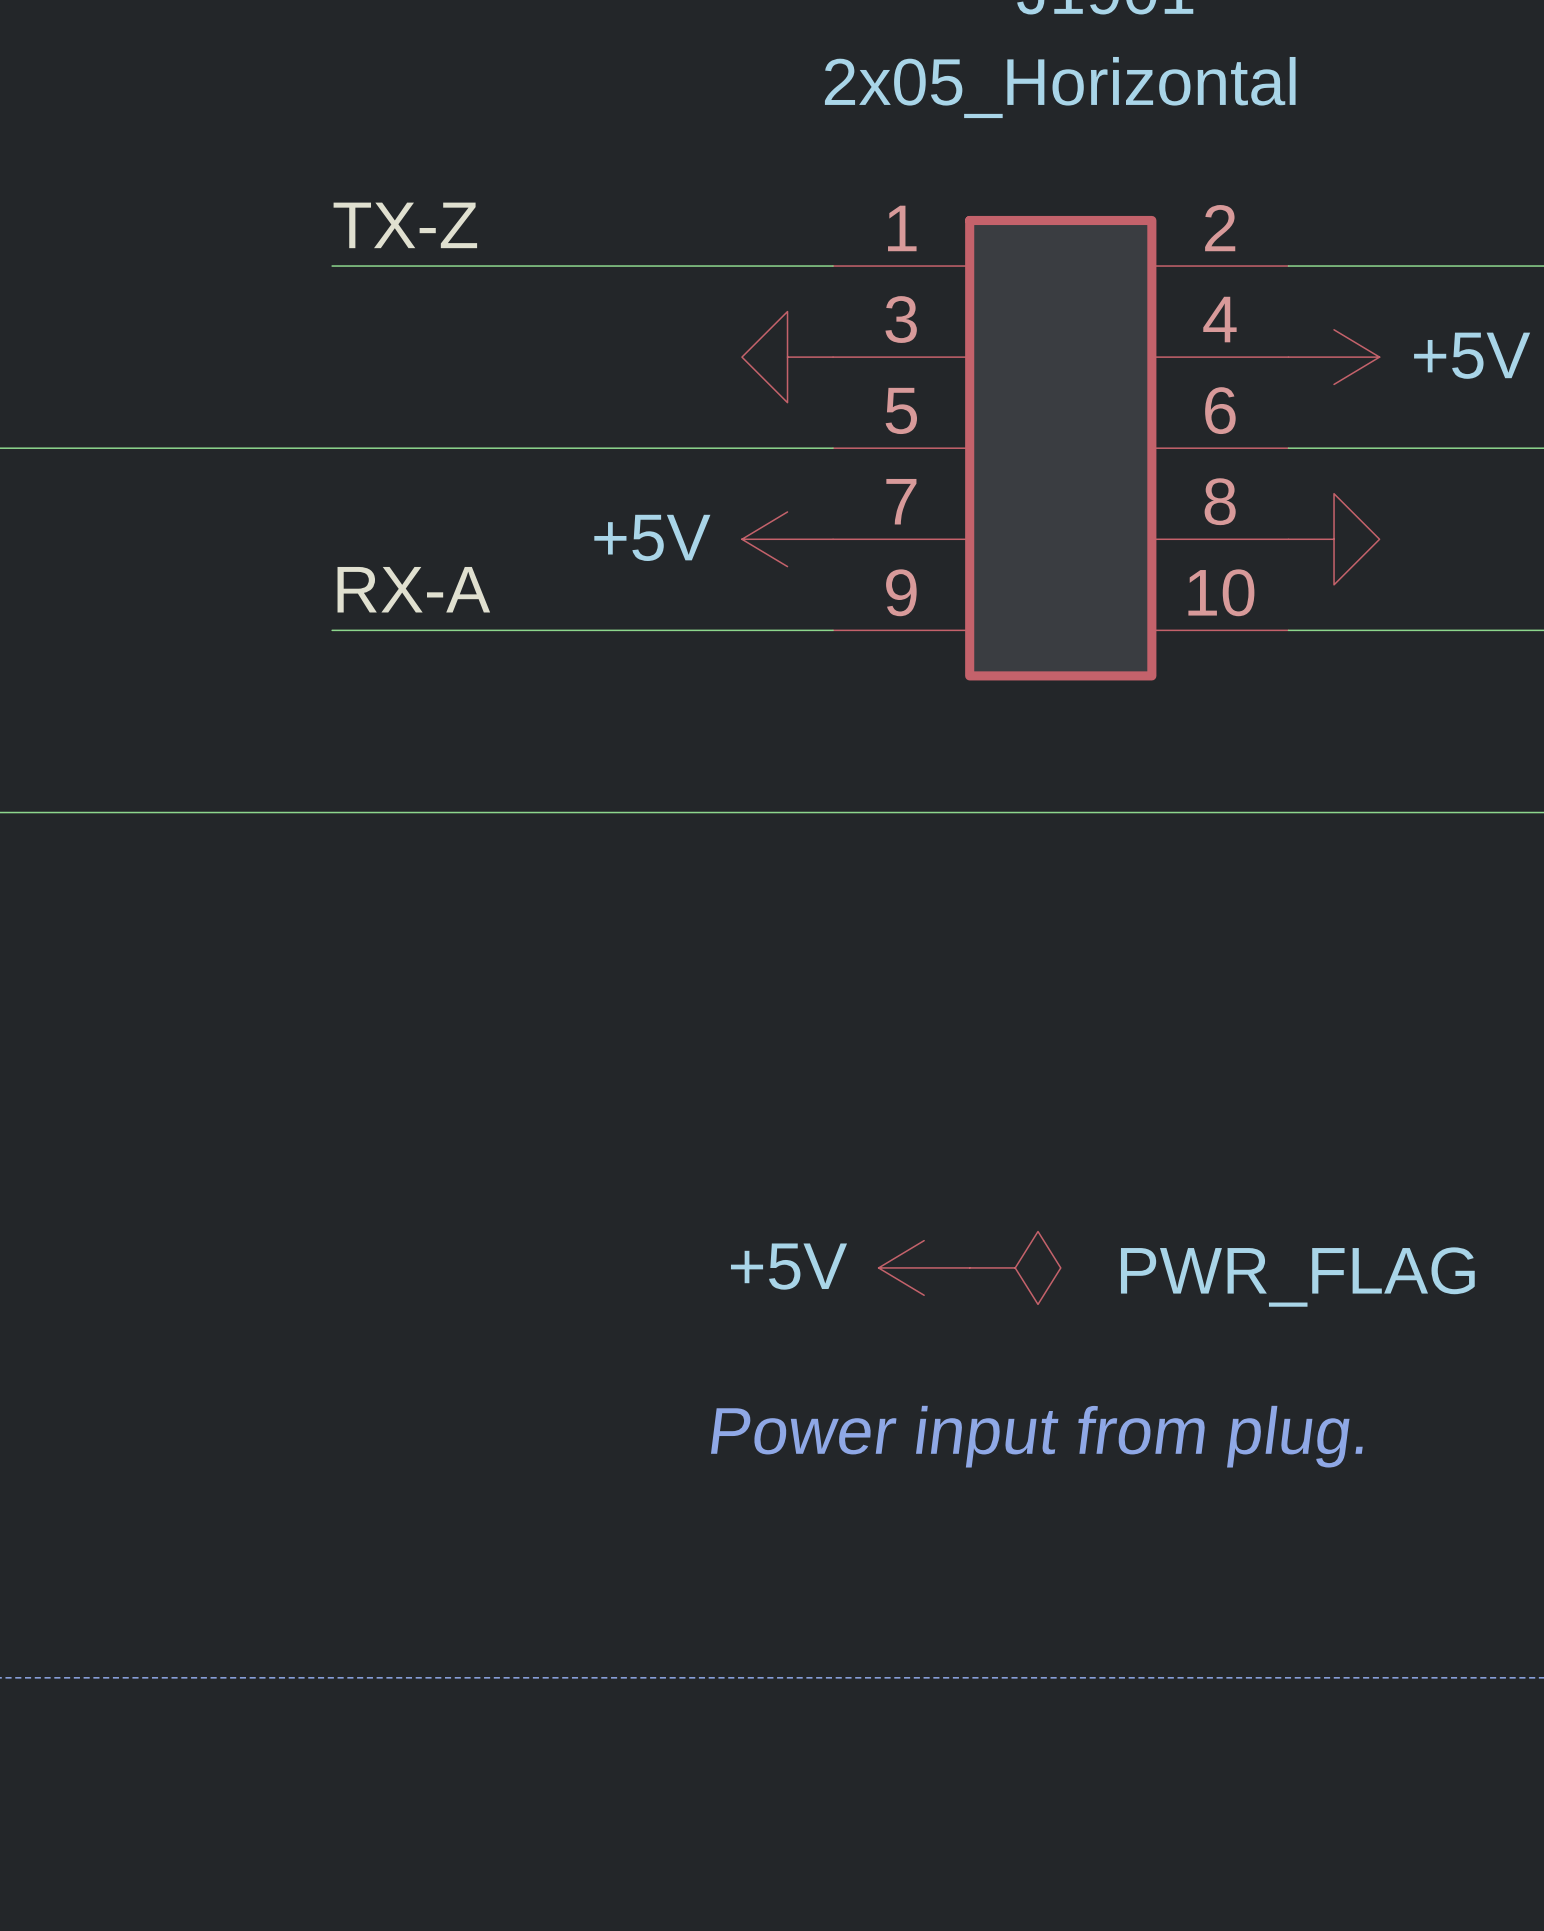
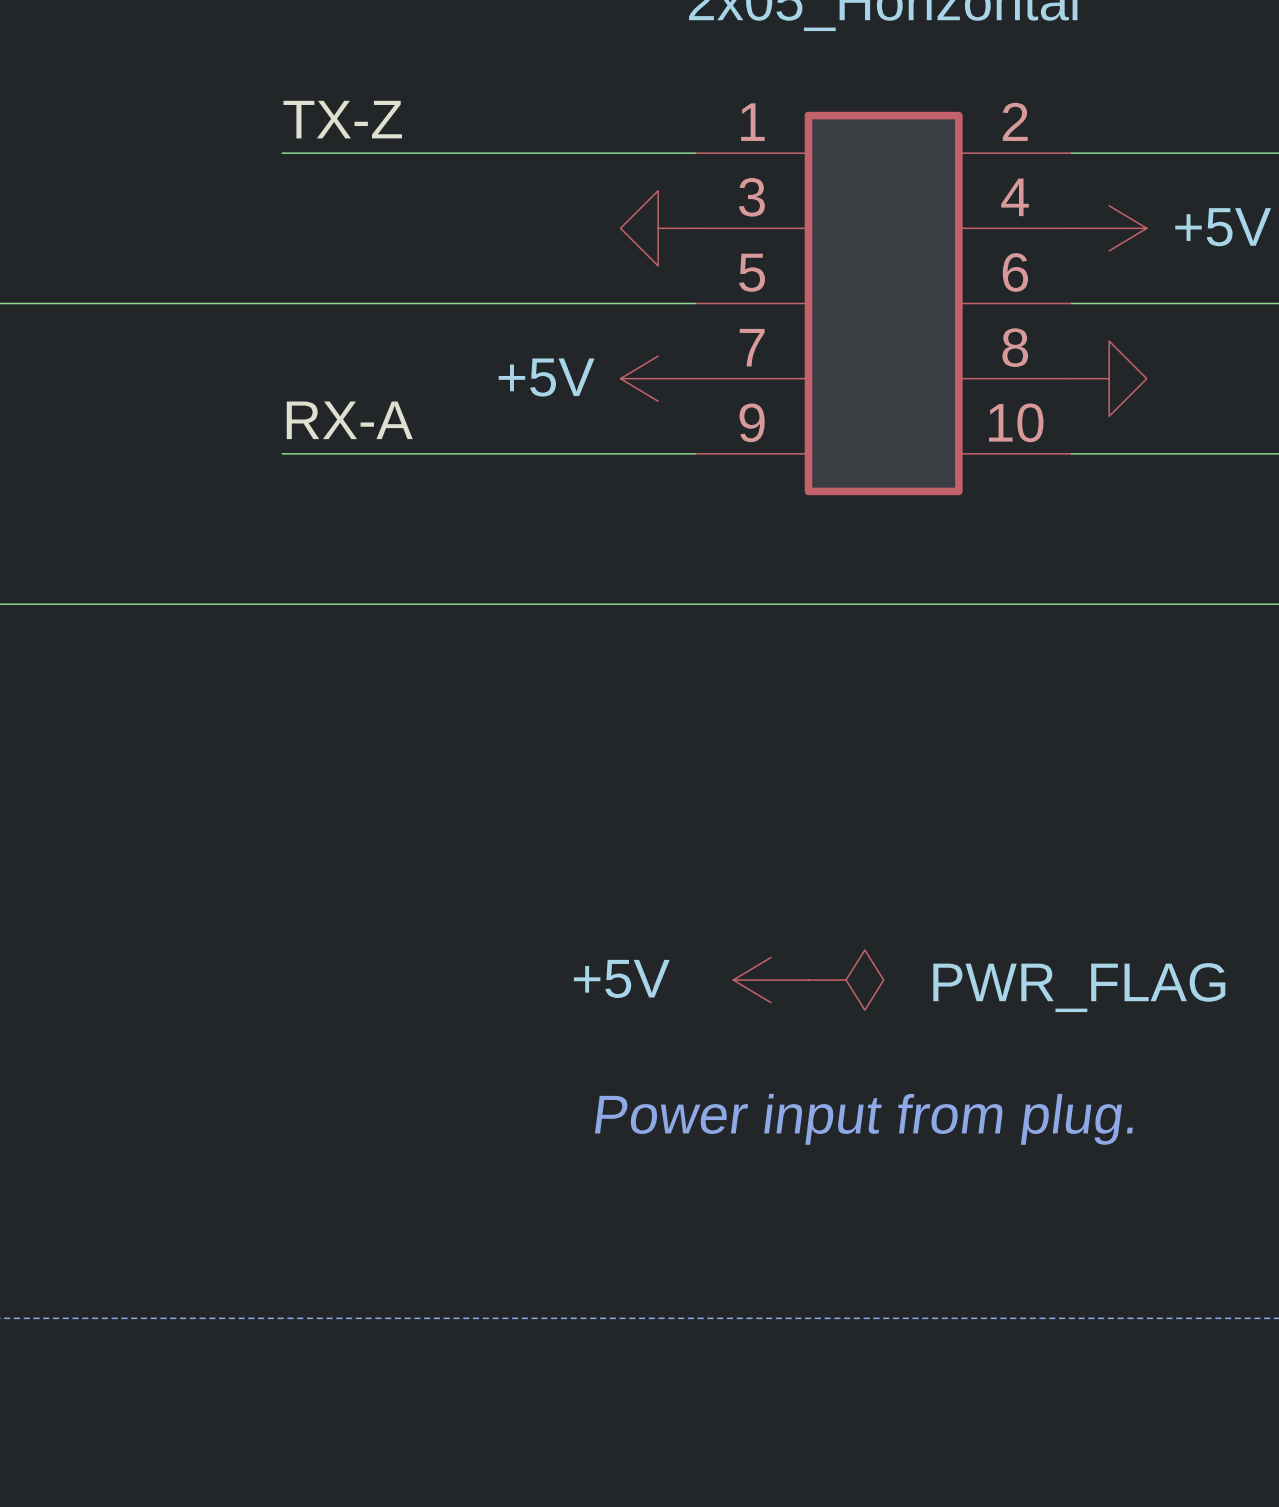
power symbol text position: +5V (788, 1266) -> +5V (621, 978)

